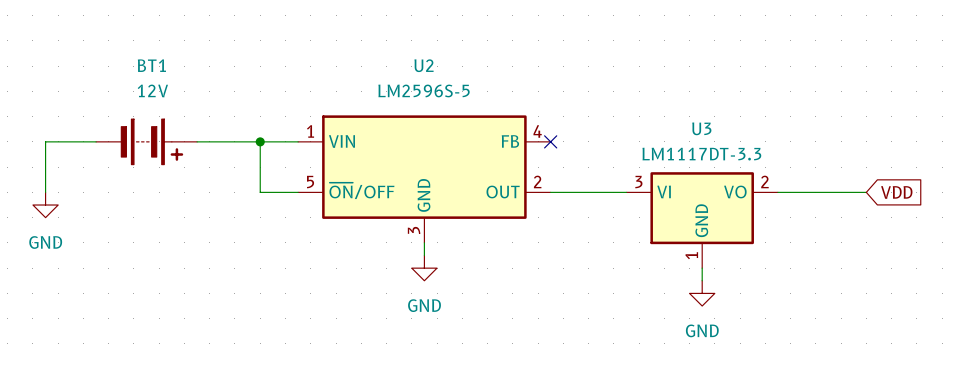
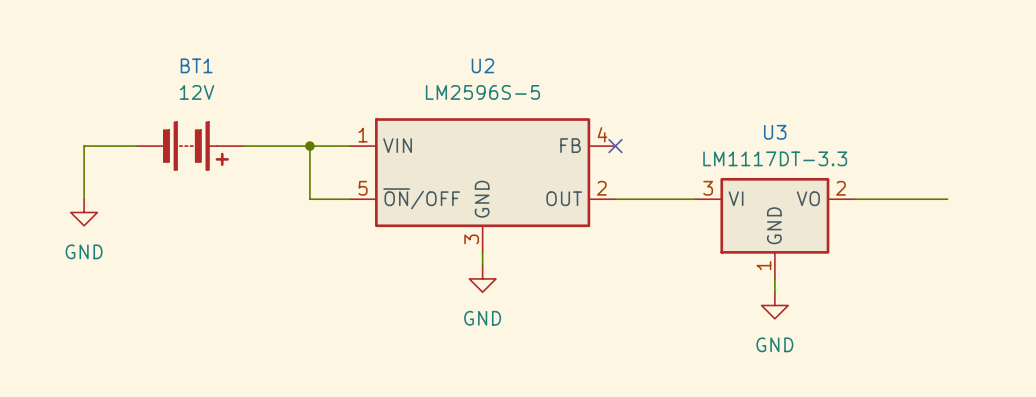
global label: VDD (896, 192) -> none

